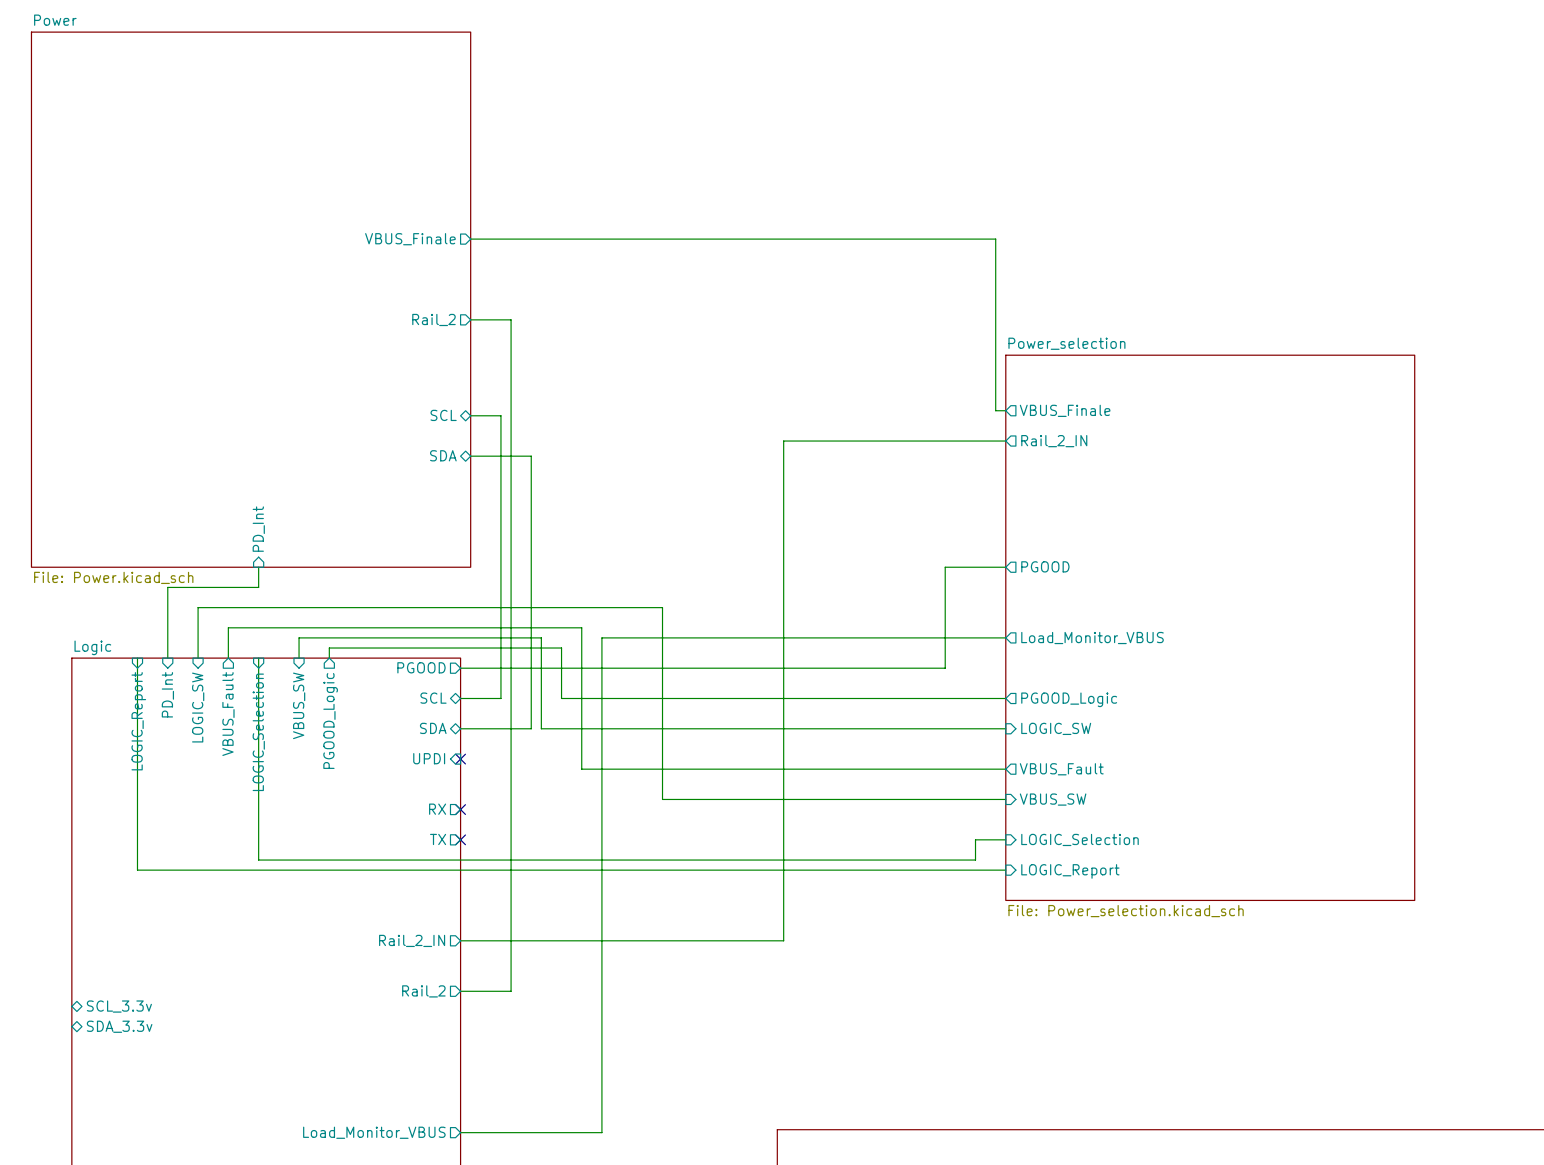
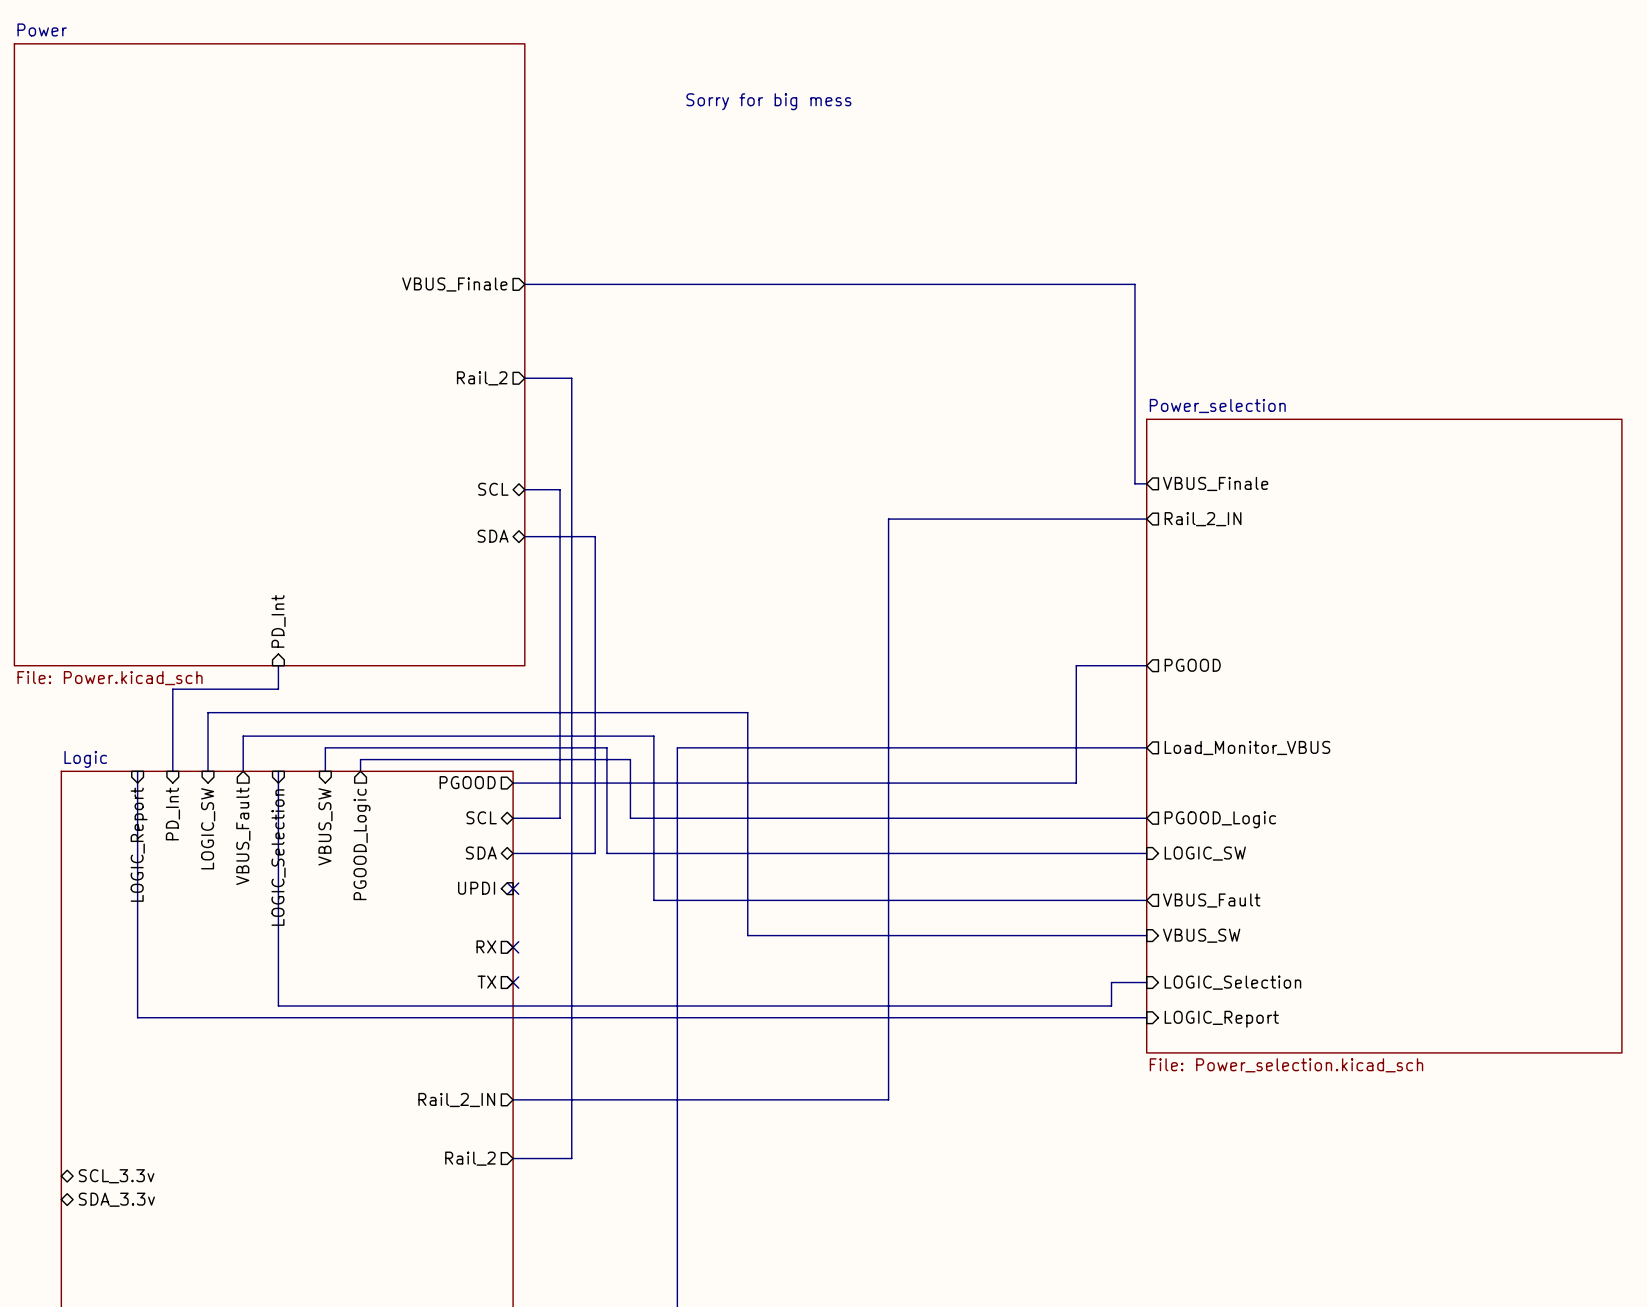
text: none -> Sorry for big mess (768, 101)

